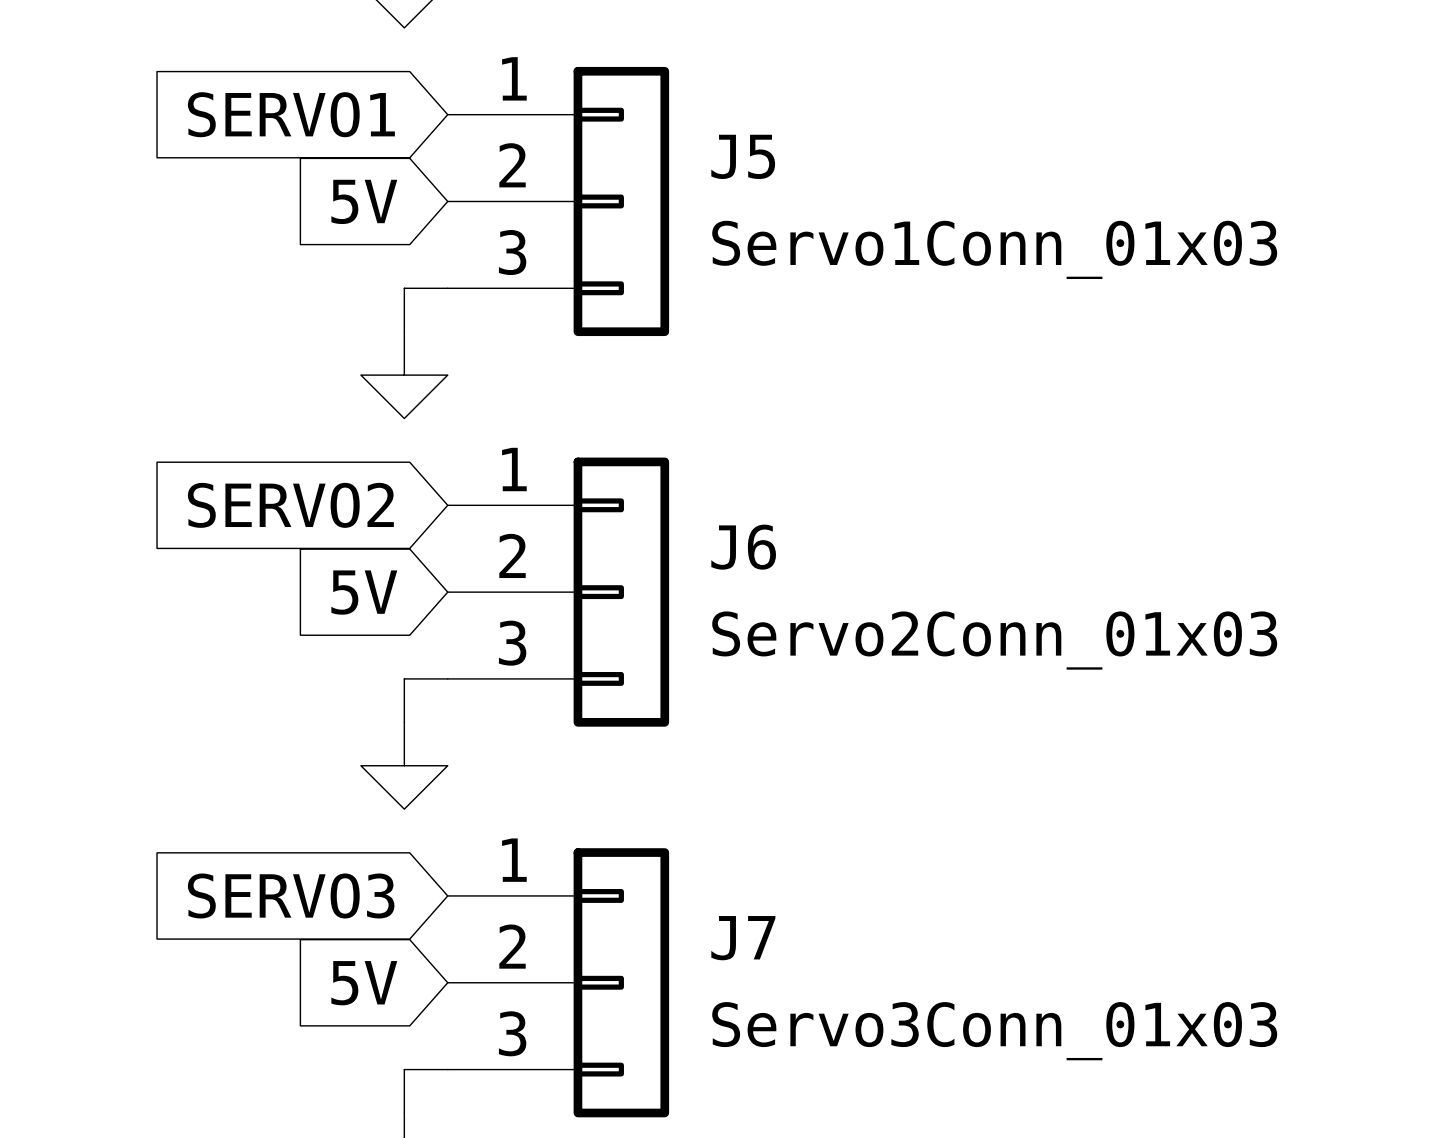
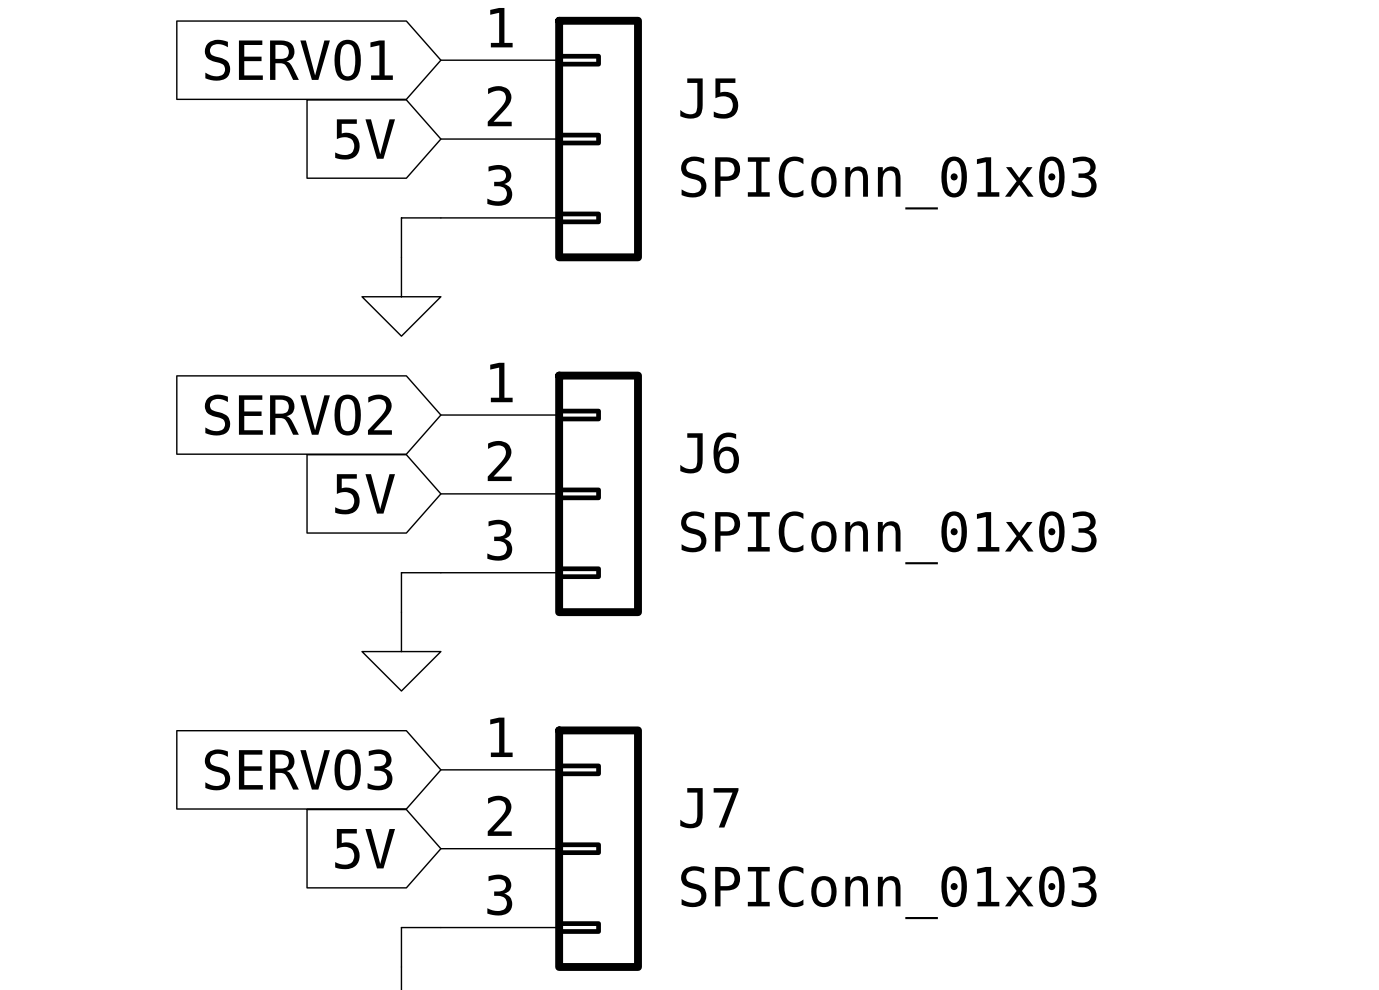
J5 value: Servo1Conn_01x03 (994, 249) -> SPIConn_01x03 (888, 183)
J6 value: Servo2Conn_01x03 (994, 640) -> SPIConn_01x03 (888, 537)
J7 value: Servo3Conn_01x03 (994, 1031) -> SPIConn_01x03 (888, 892)

